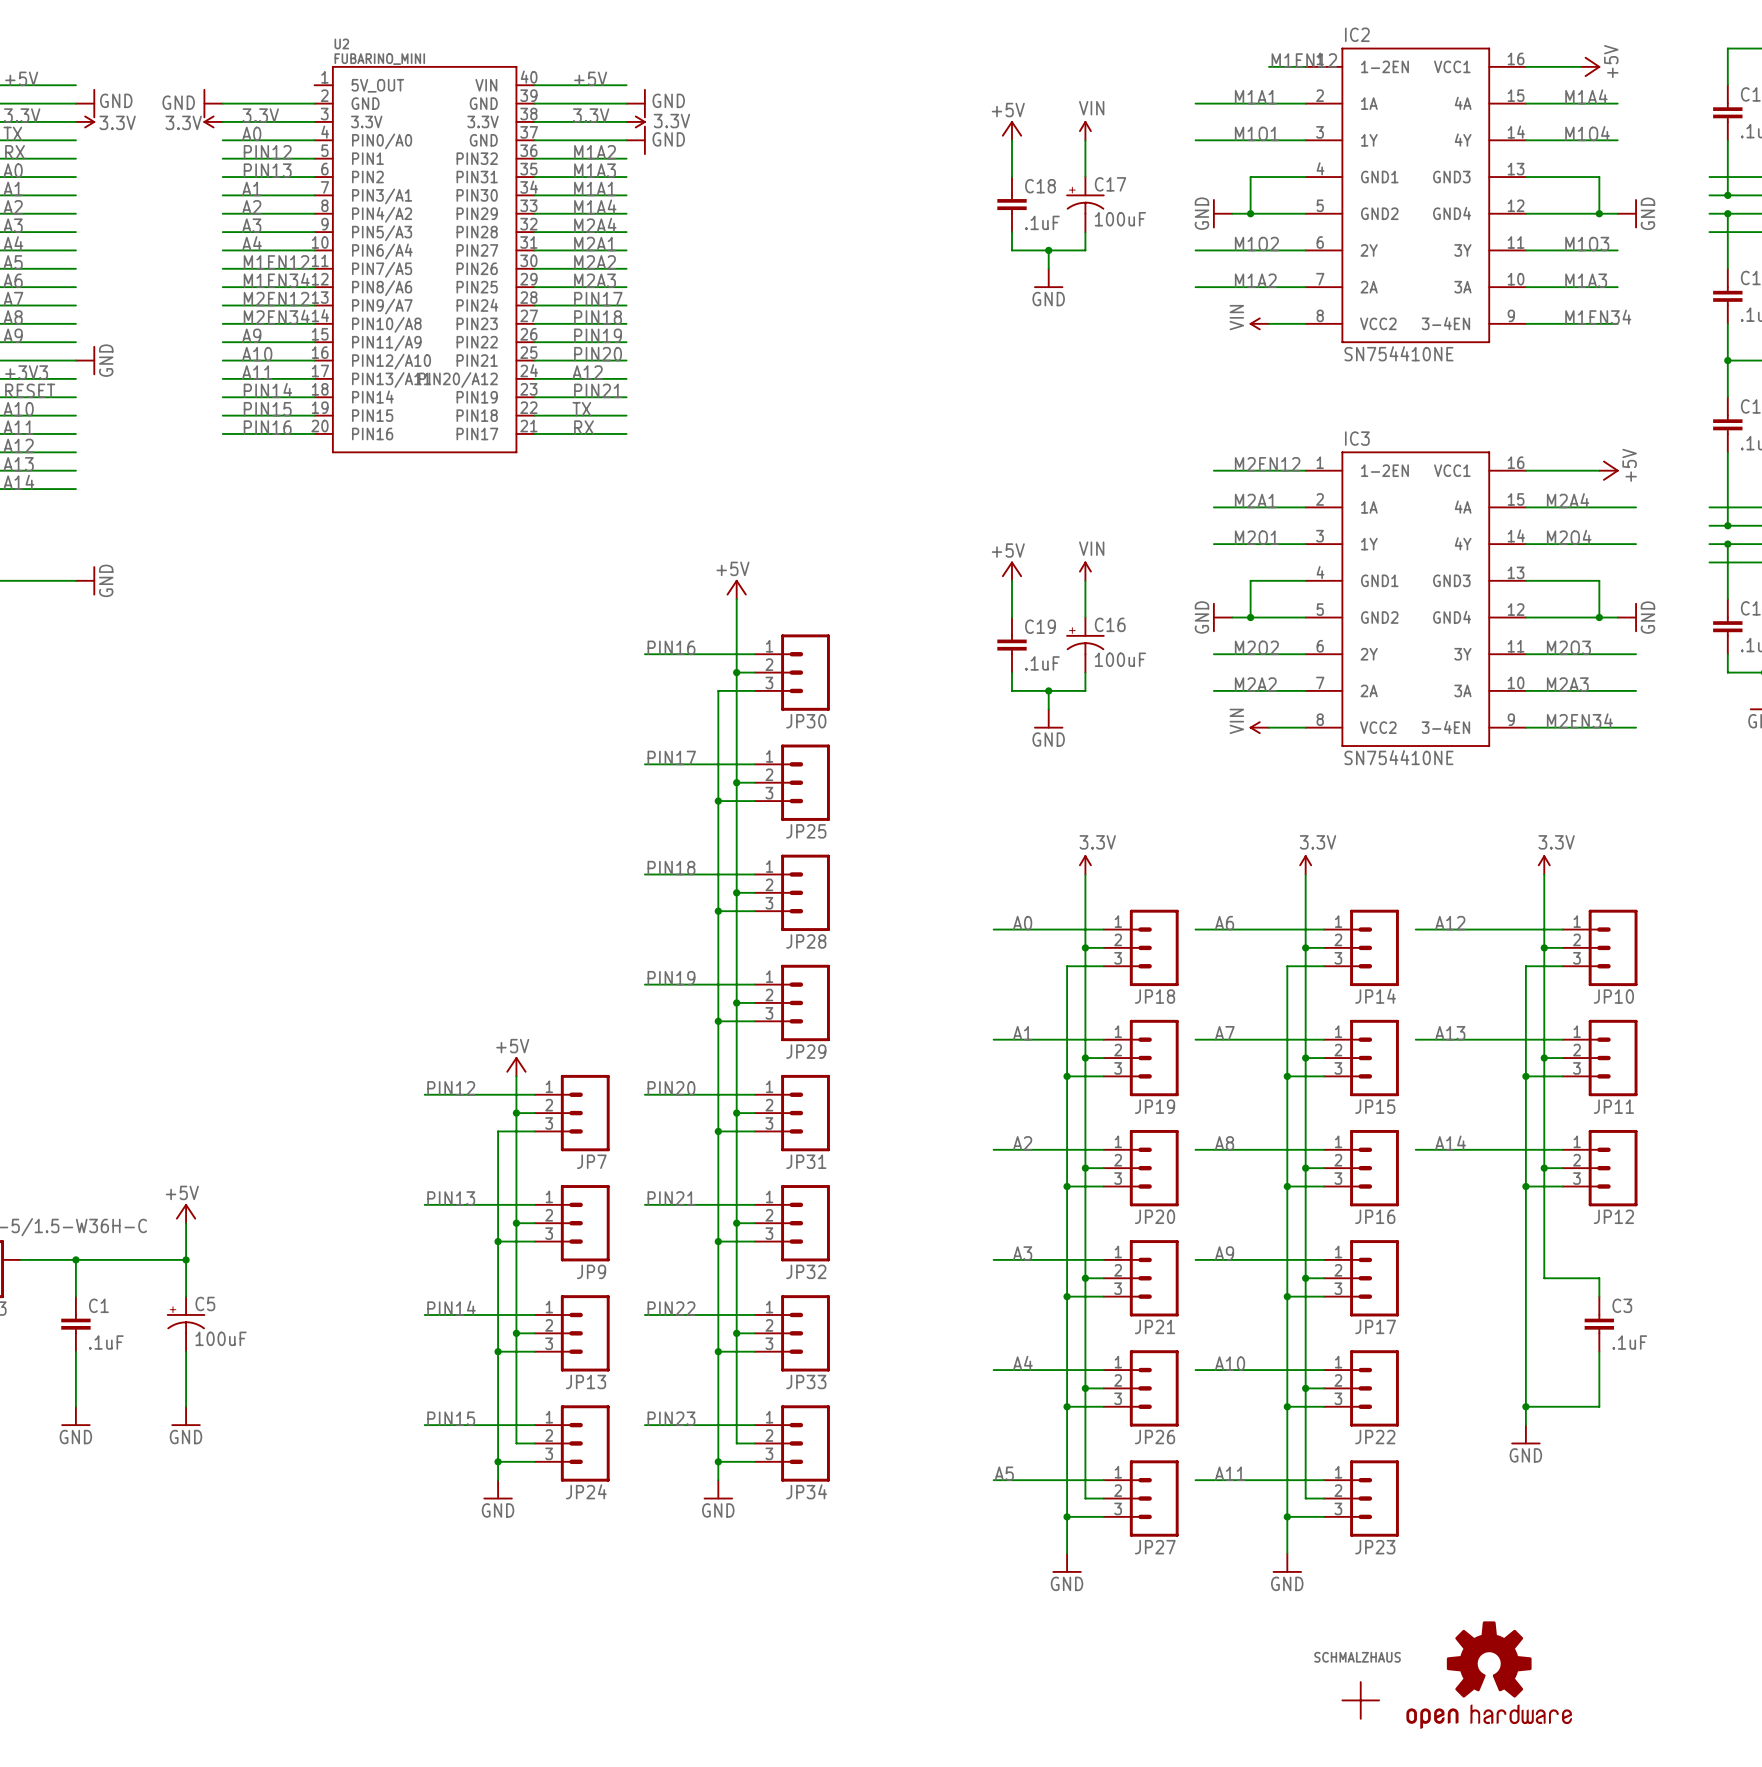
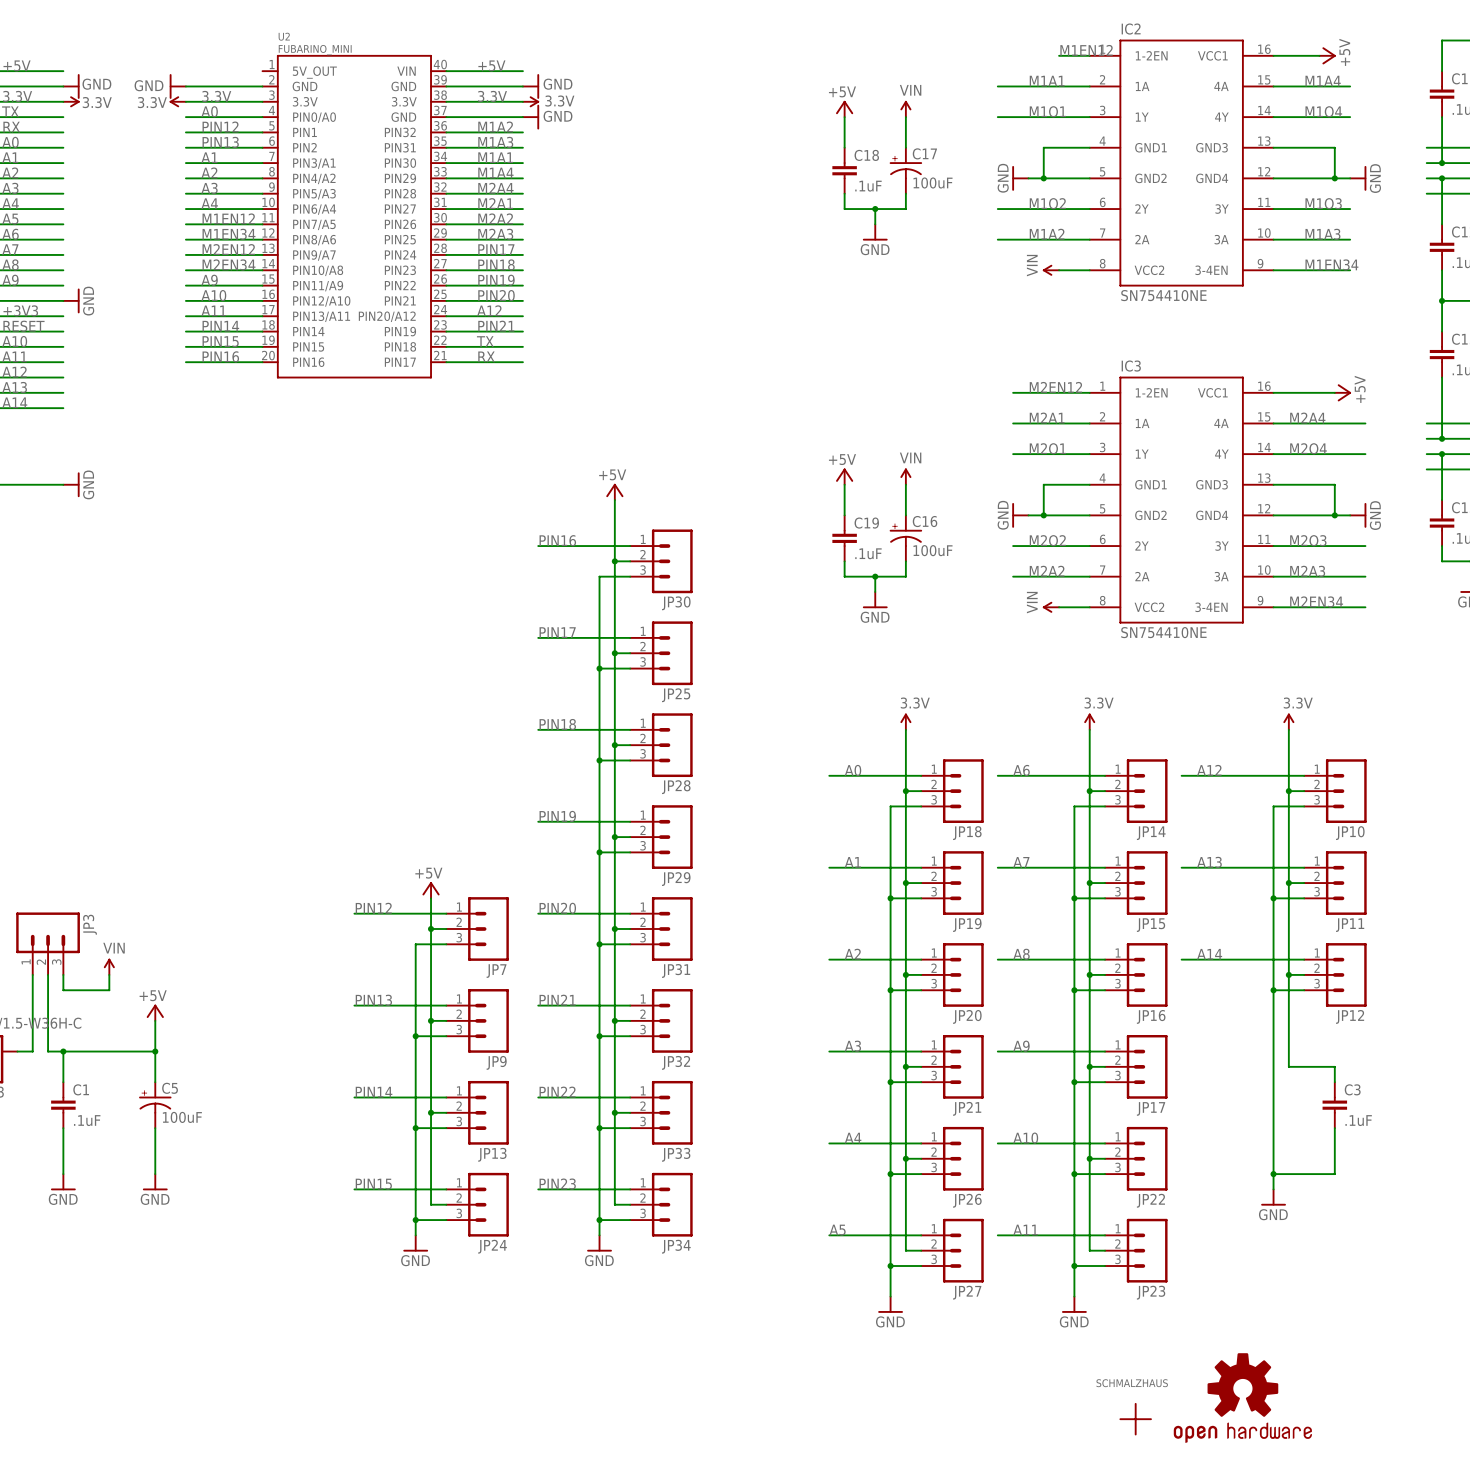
JP3: none -> (48, 943)
power symbol: none -> VIN (109, 966)
wire: none -> (48, 974) (48, 1051)
wire: none -> (63, 974) (63, 990) (109, 990) (109, 974)
wire: (39, 1259) (57, 1259) -> (32, 1051) (32, 974)

